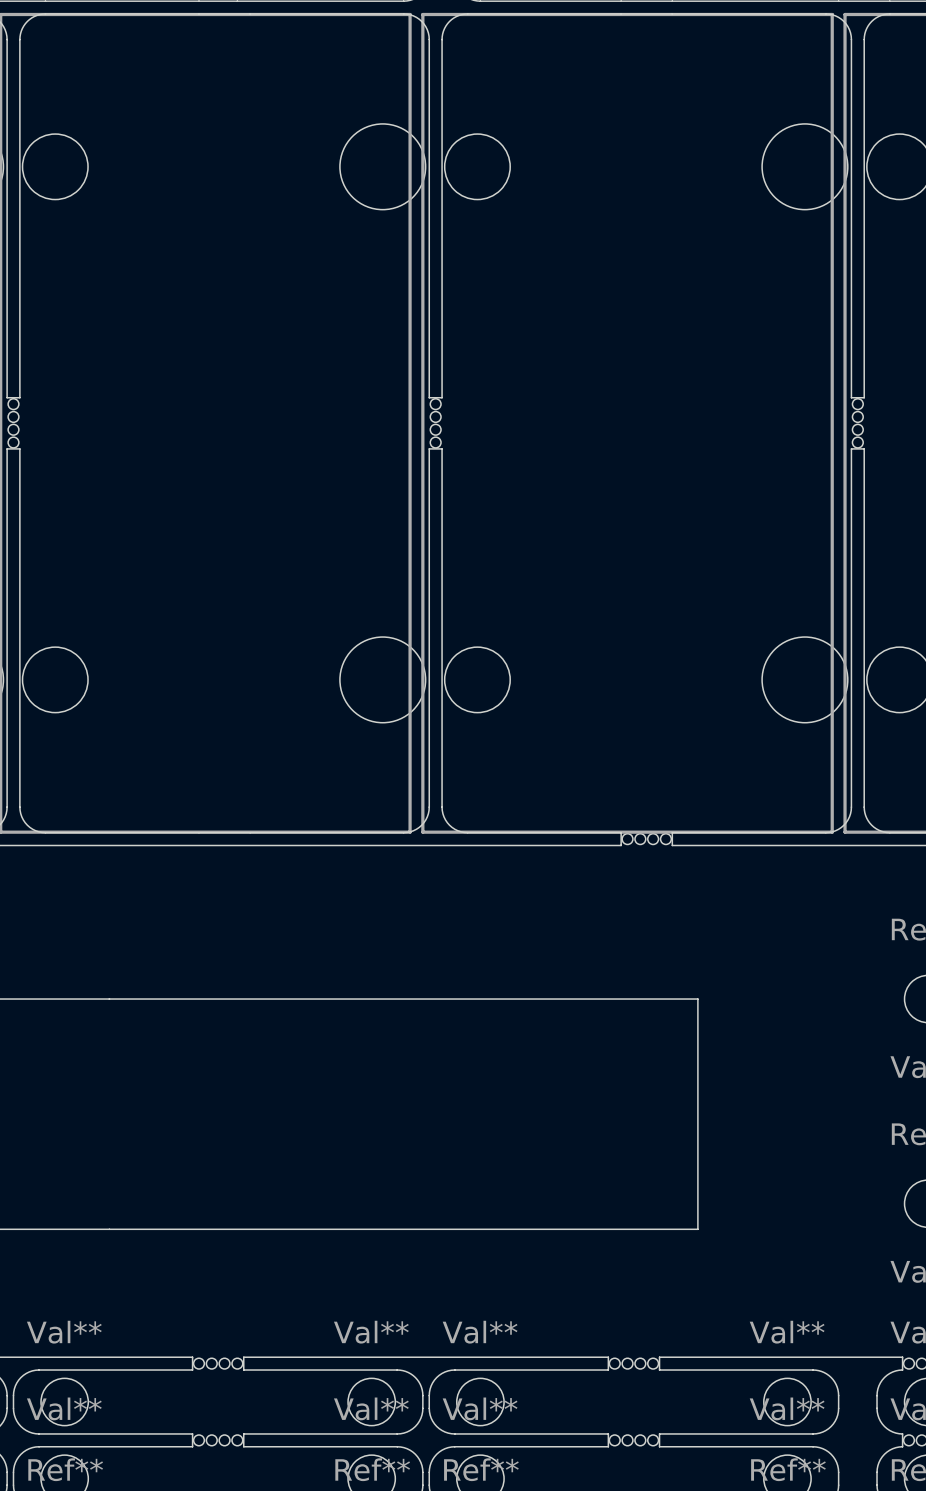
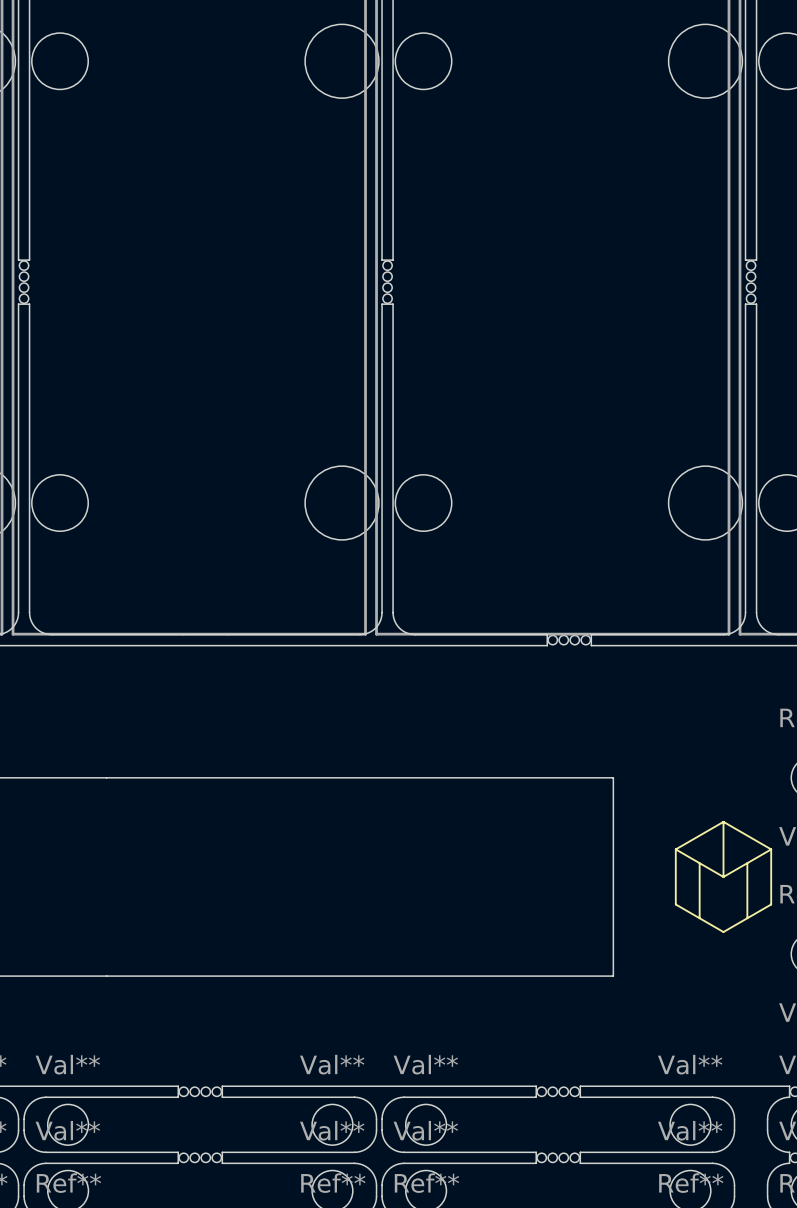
drawing: none -> [674, 820, 773, 933]

